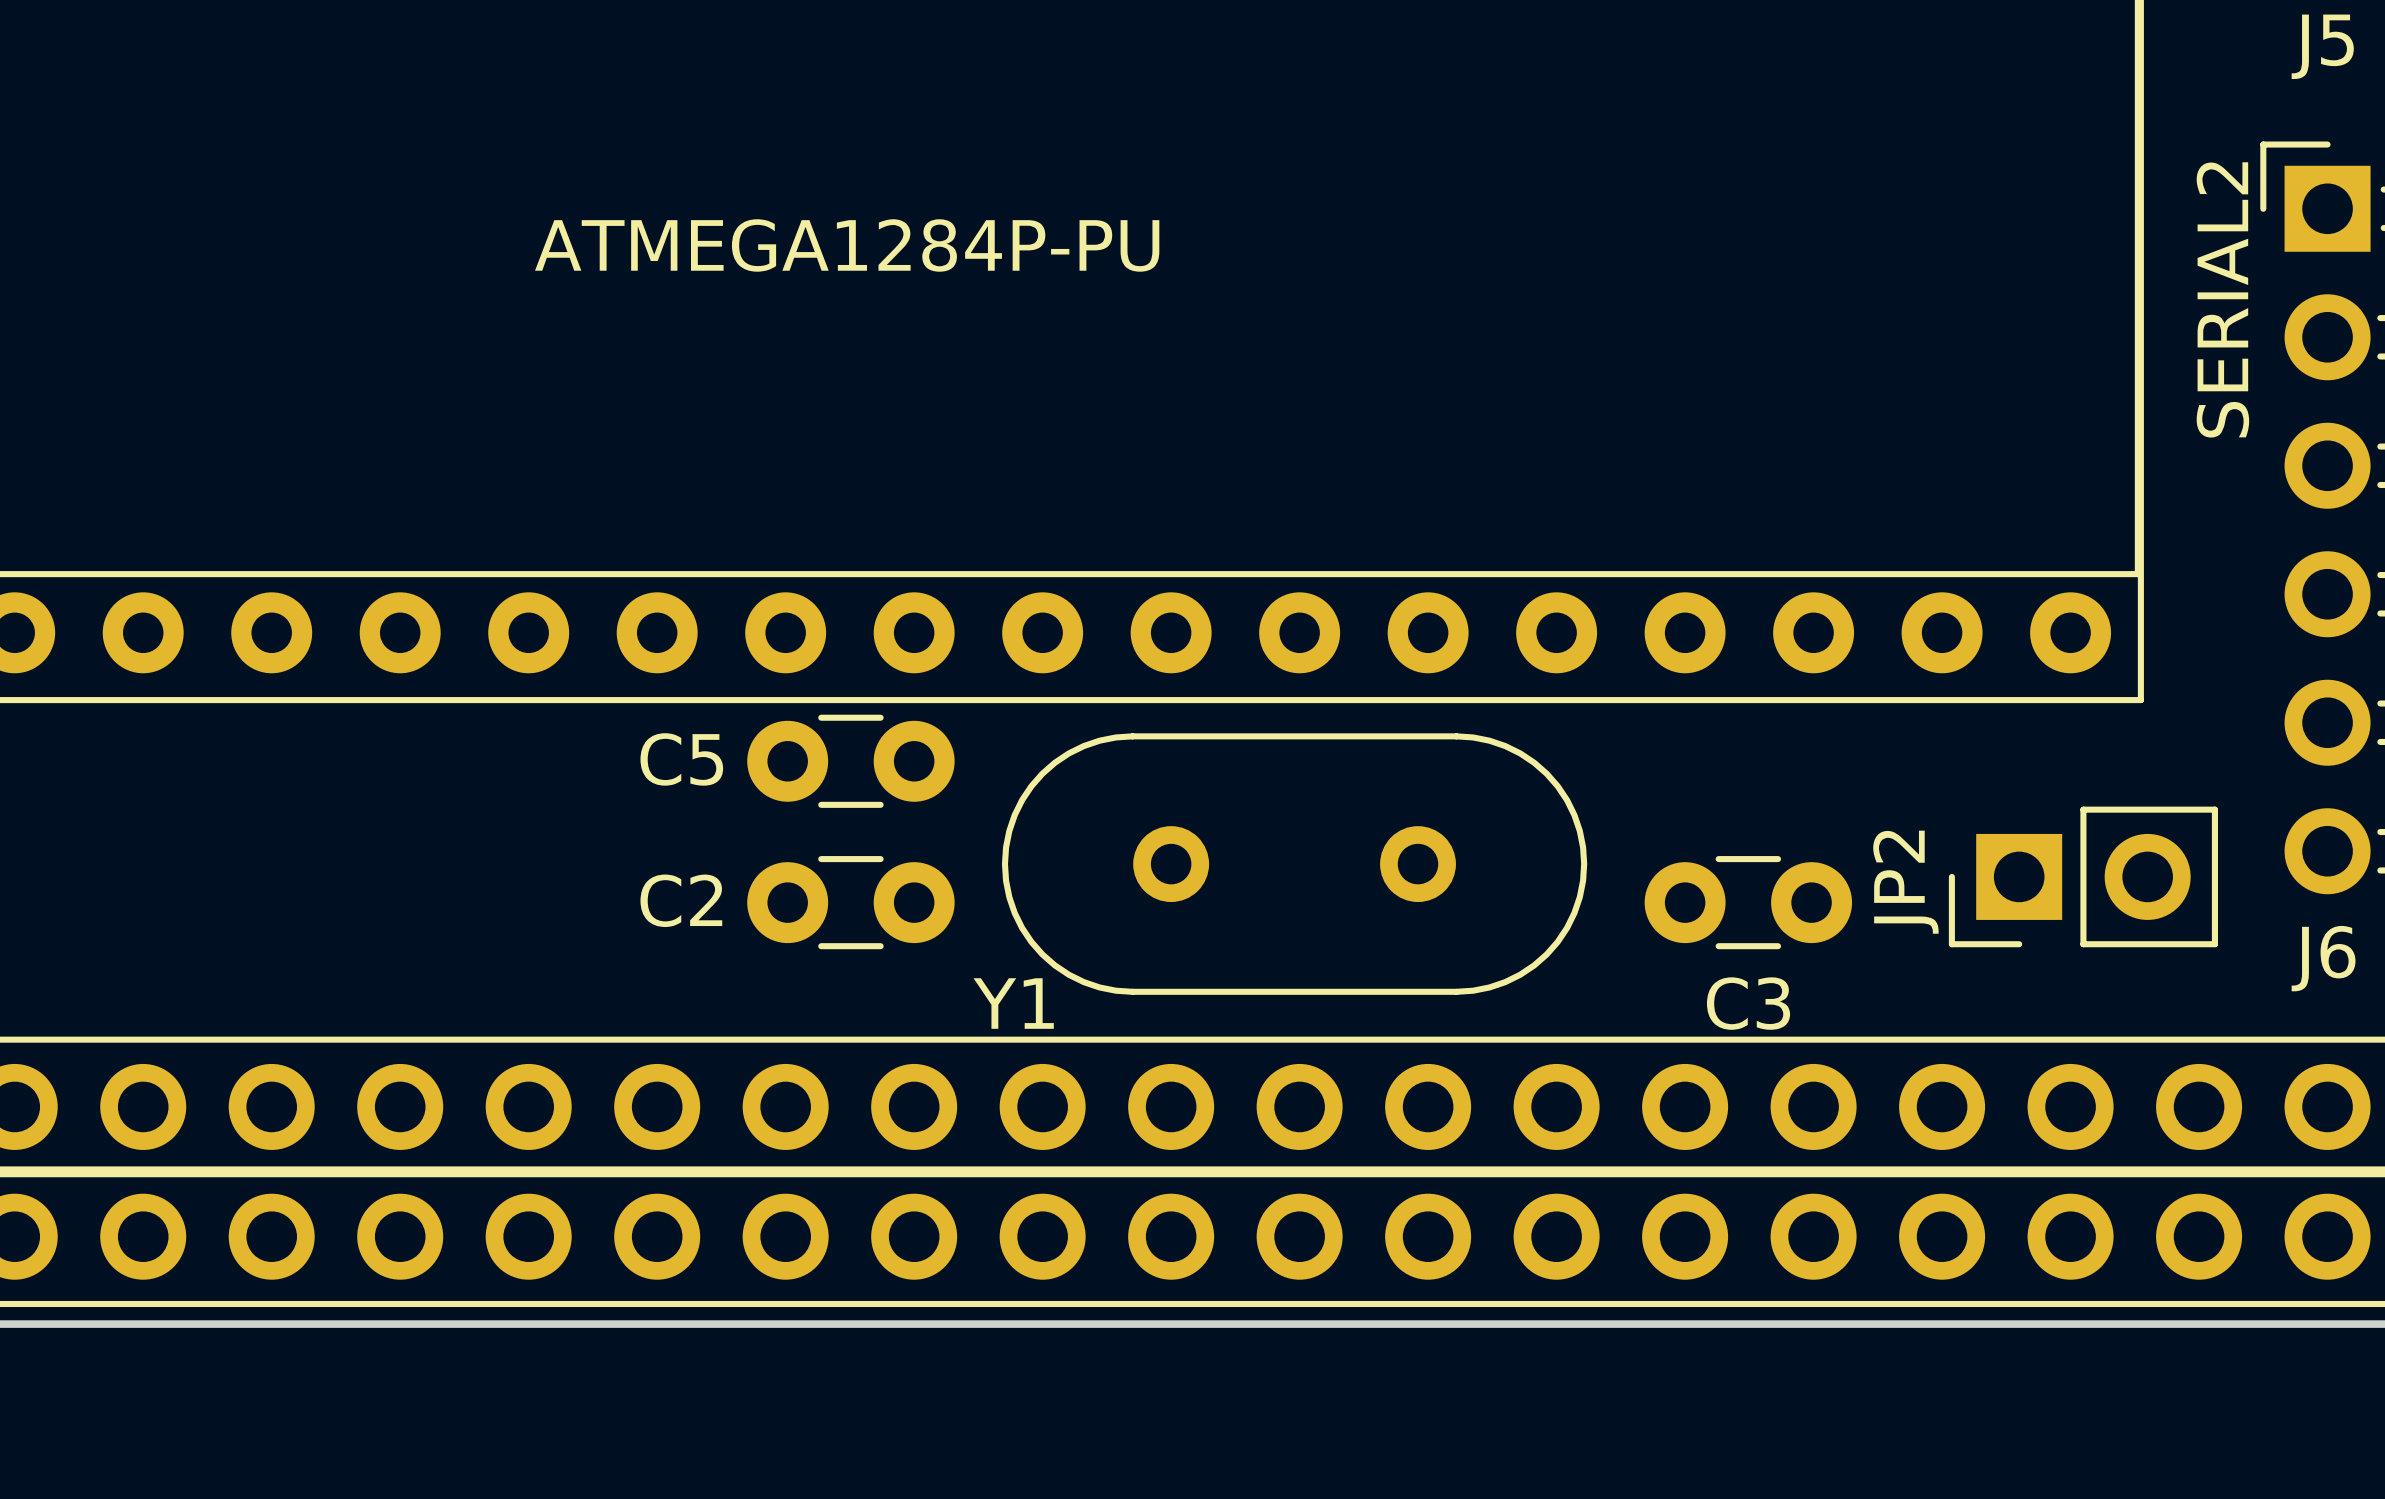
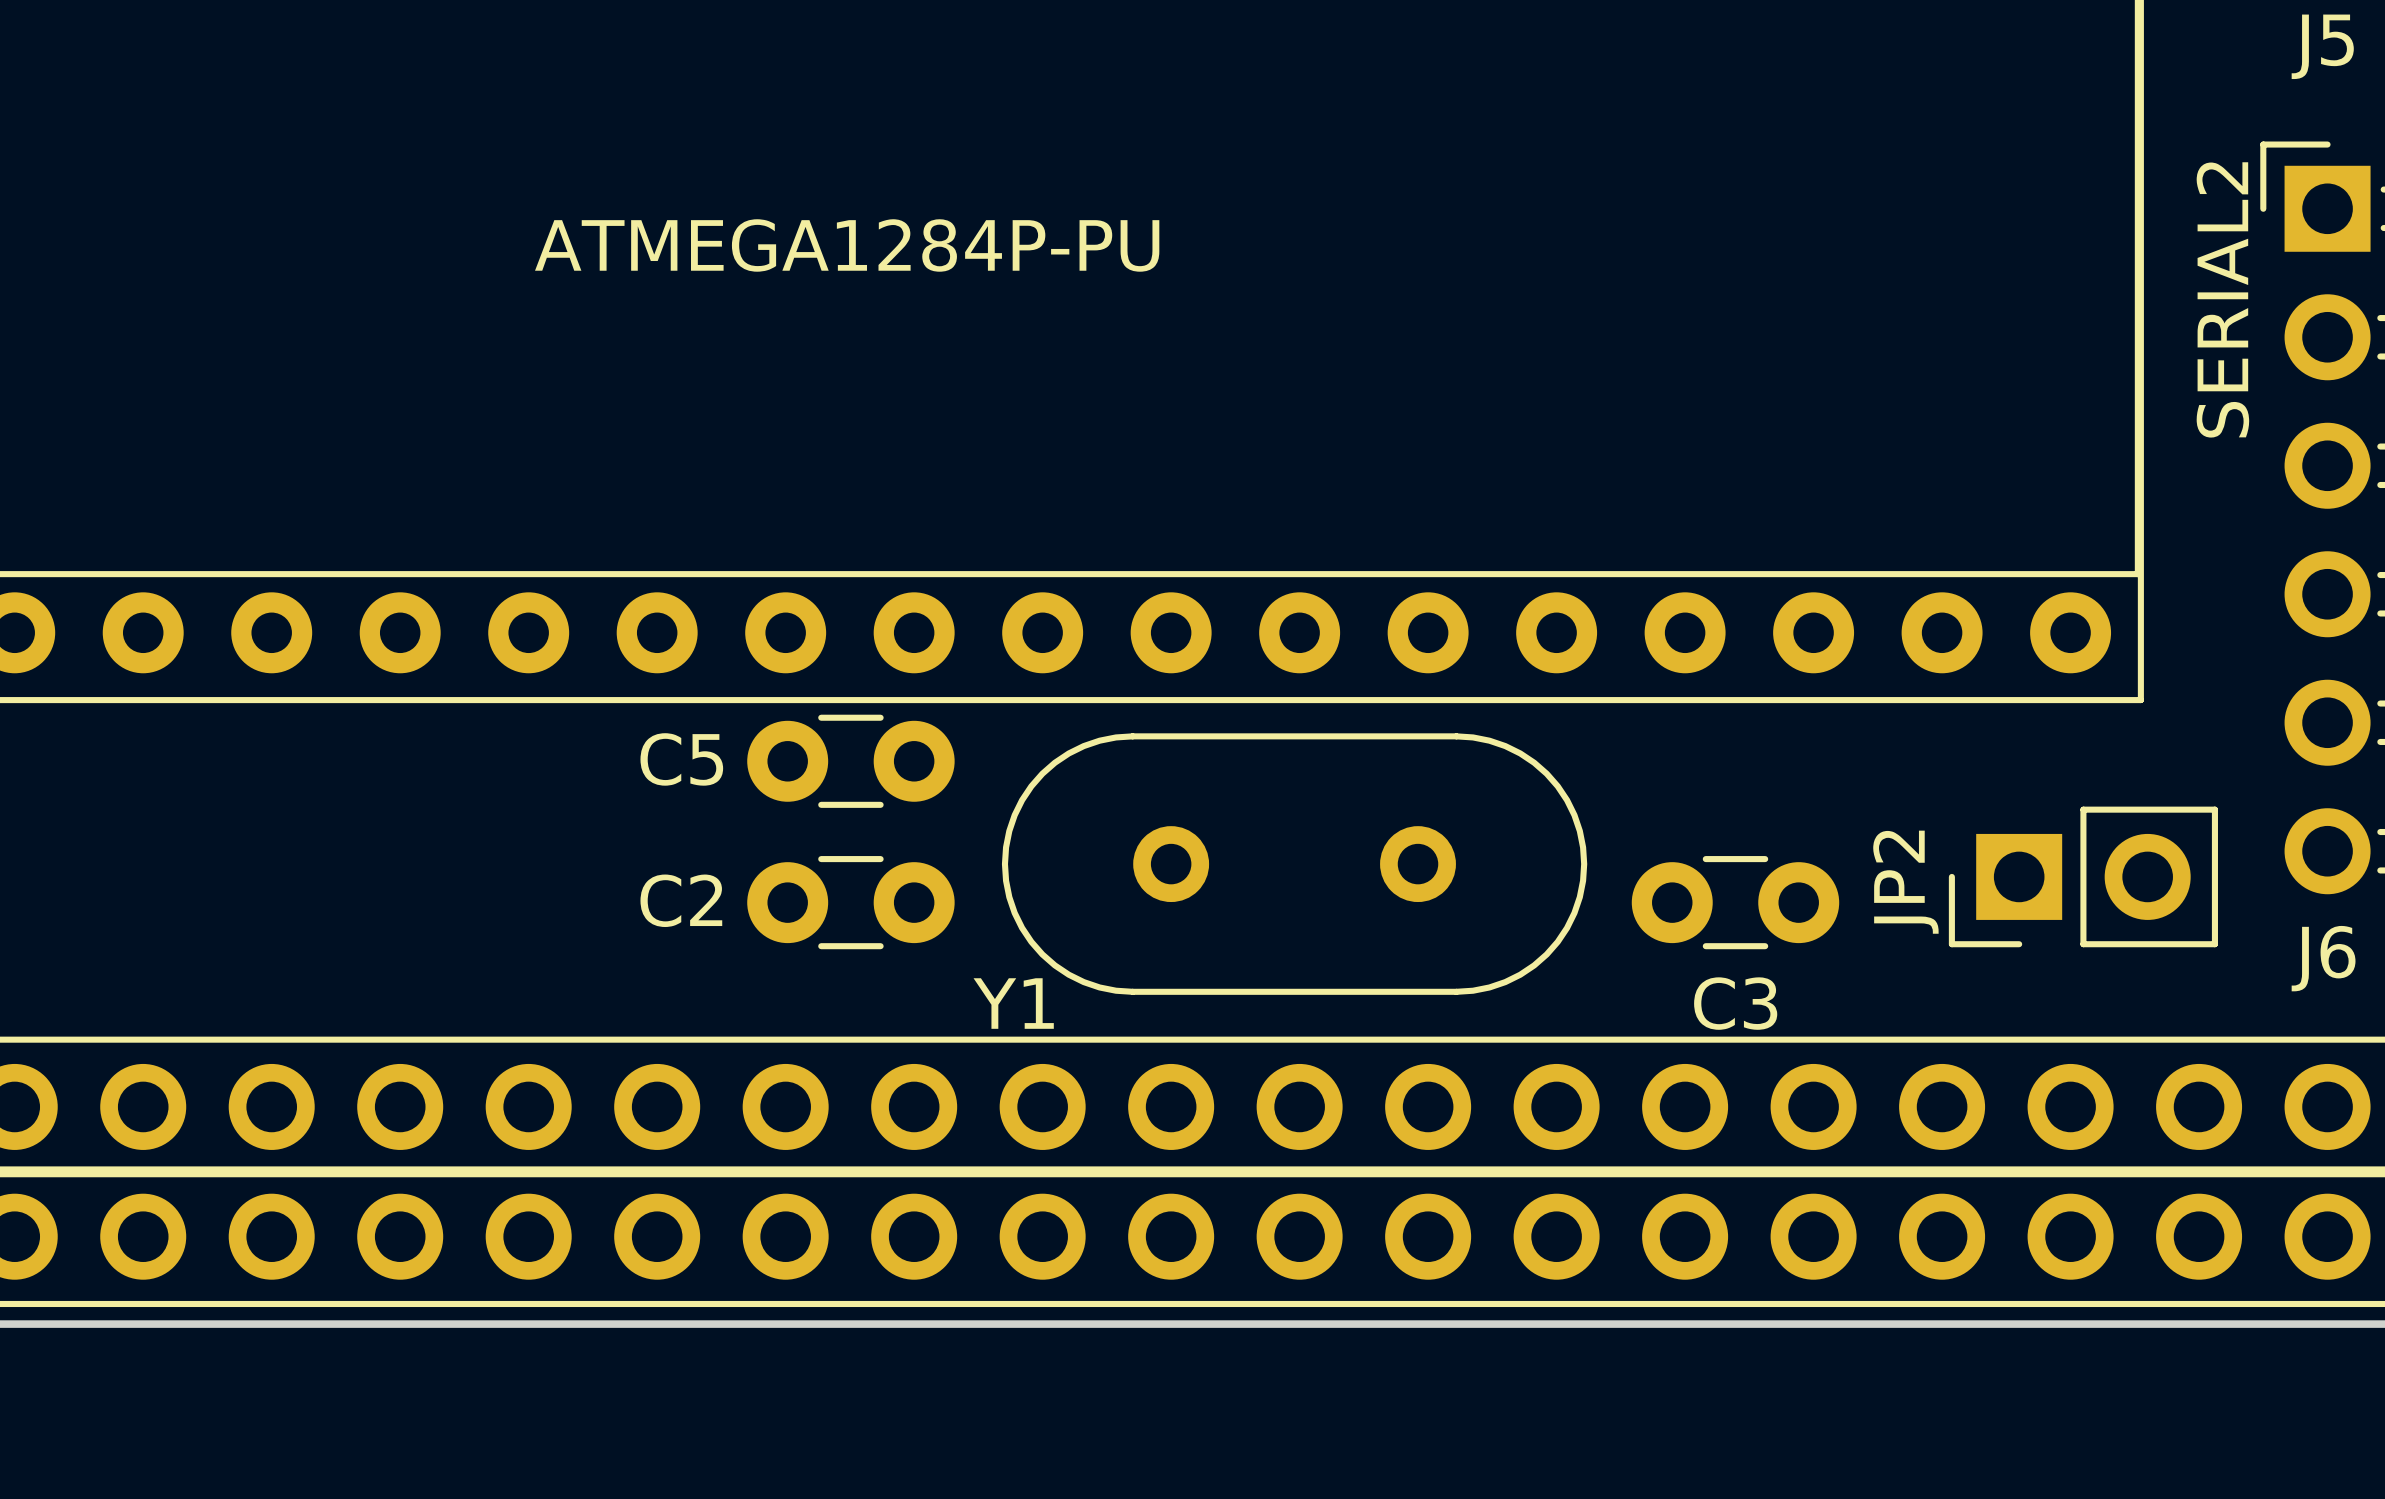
C3 position: (1748, 902) -> (1735, 902)

